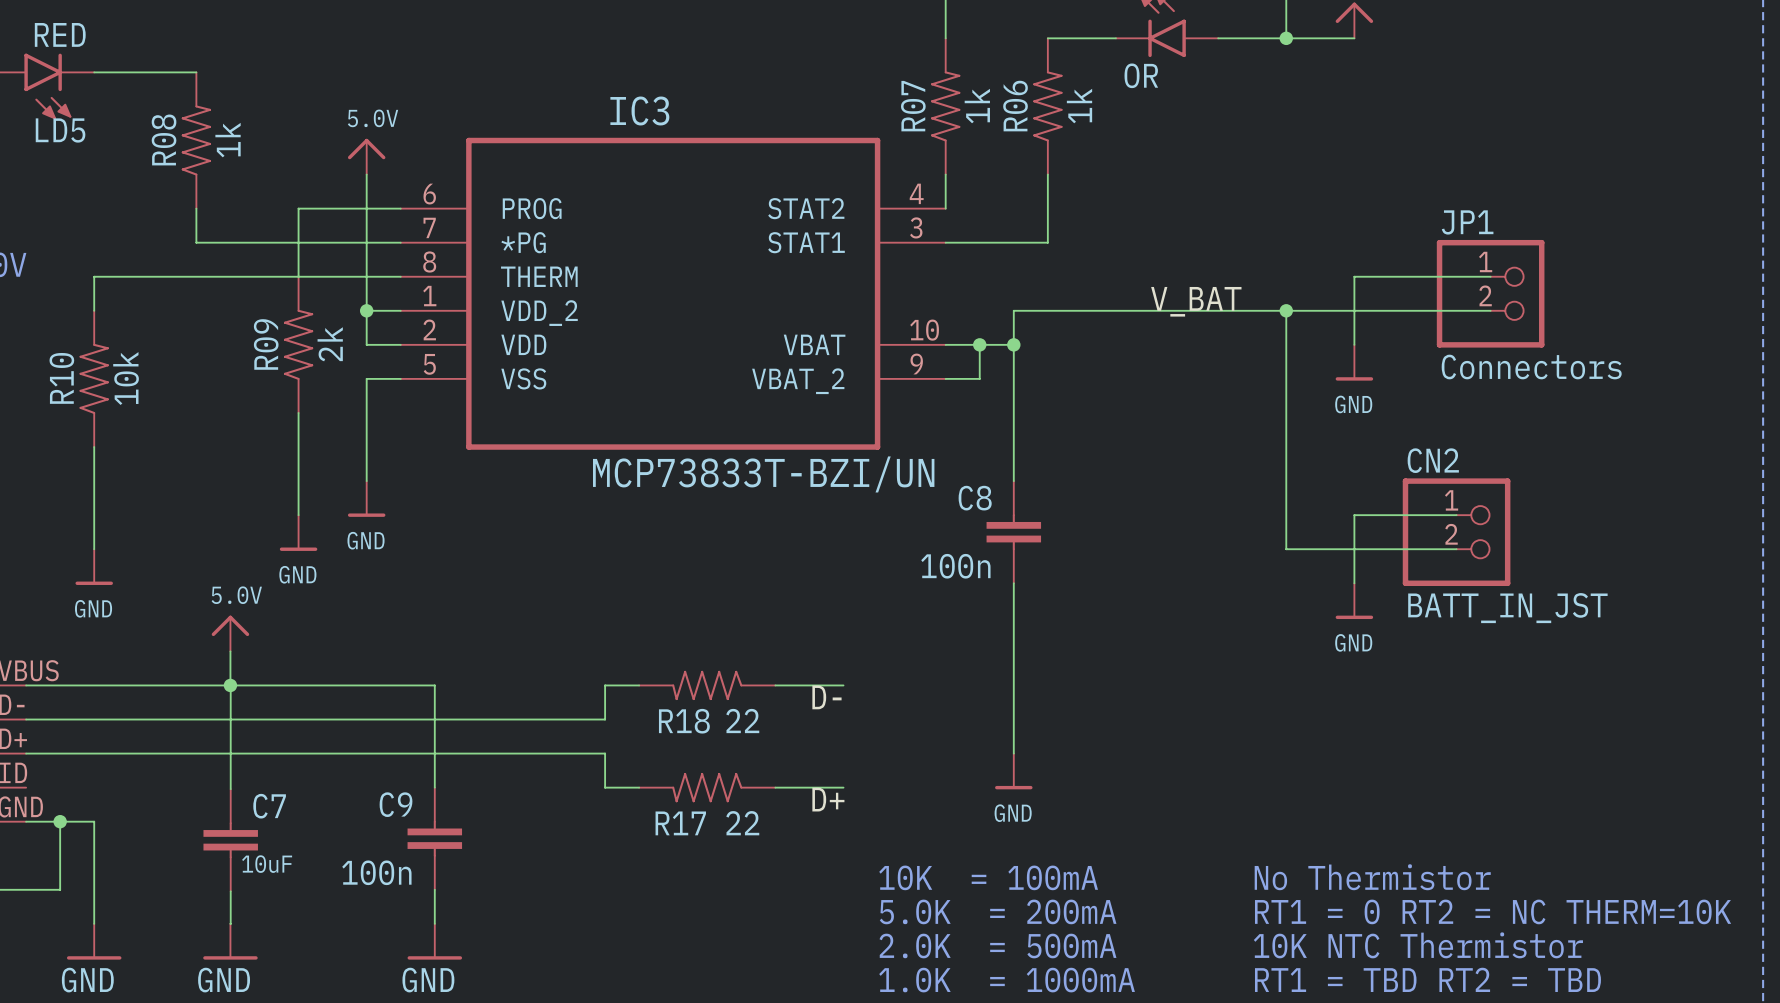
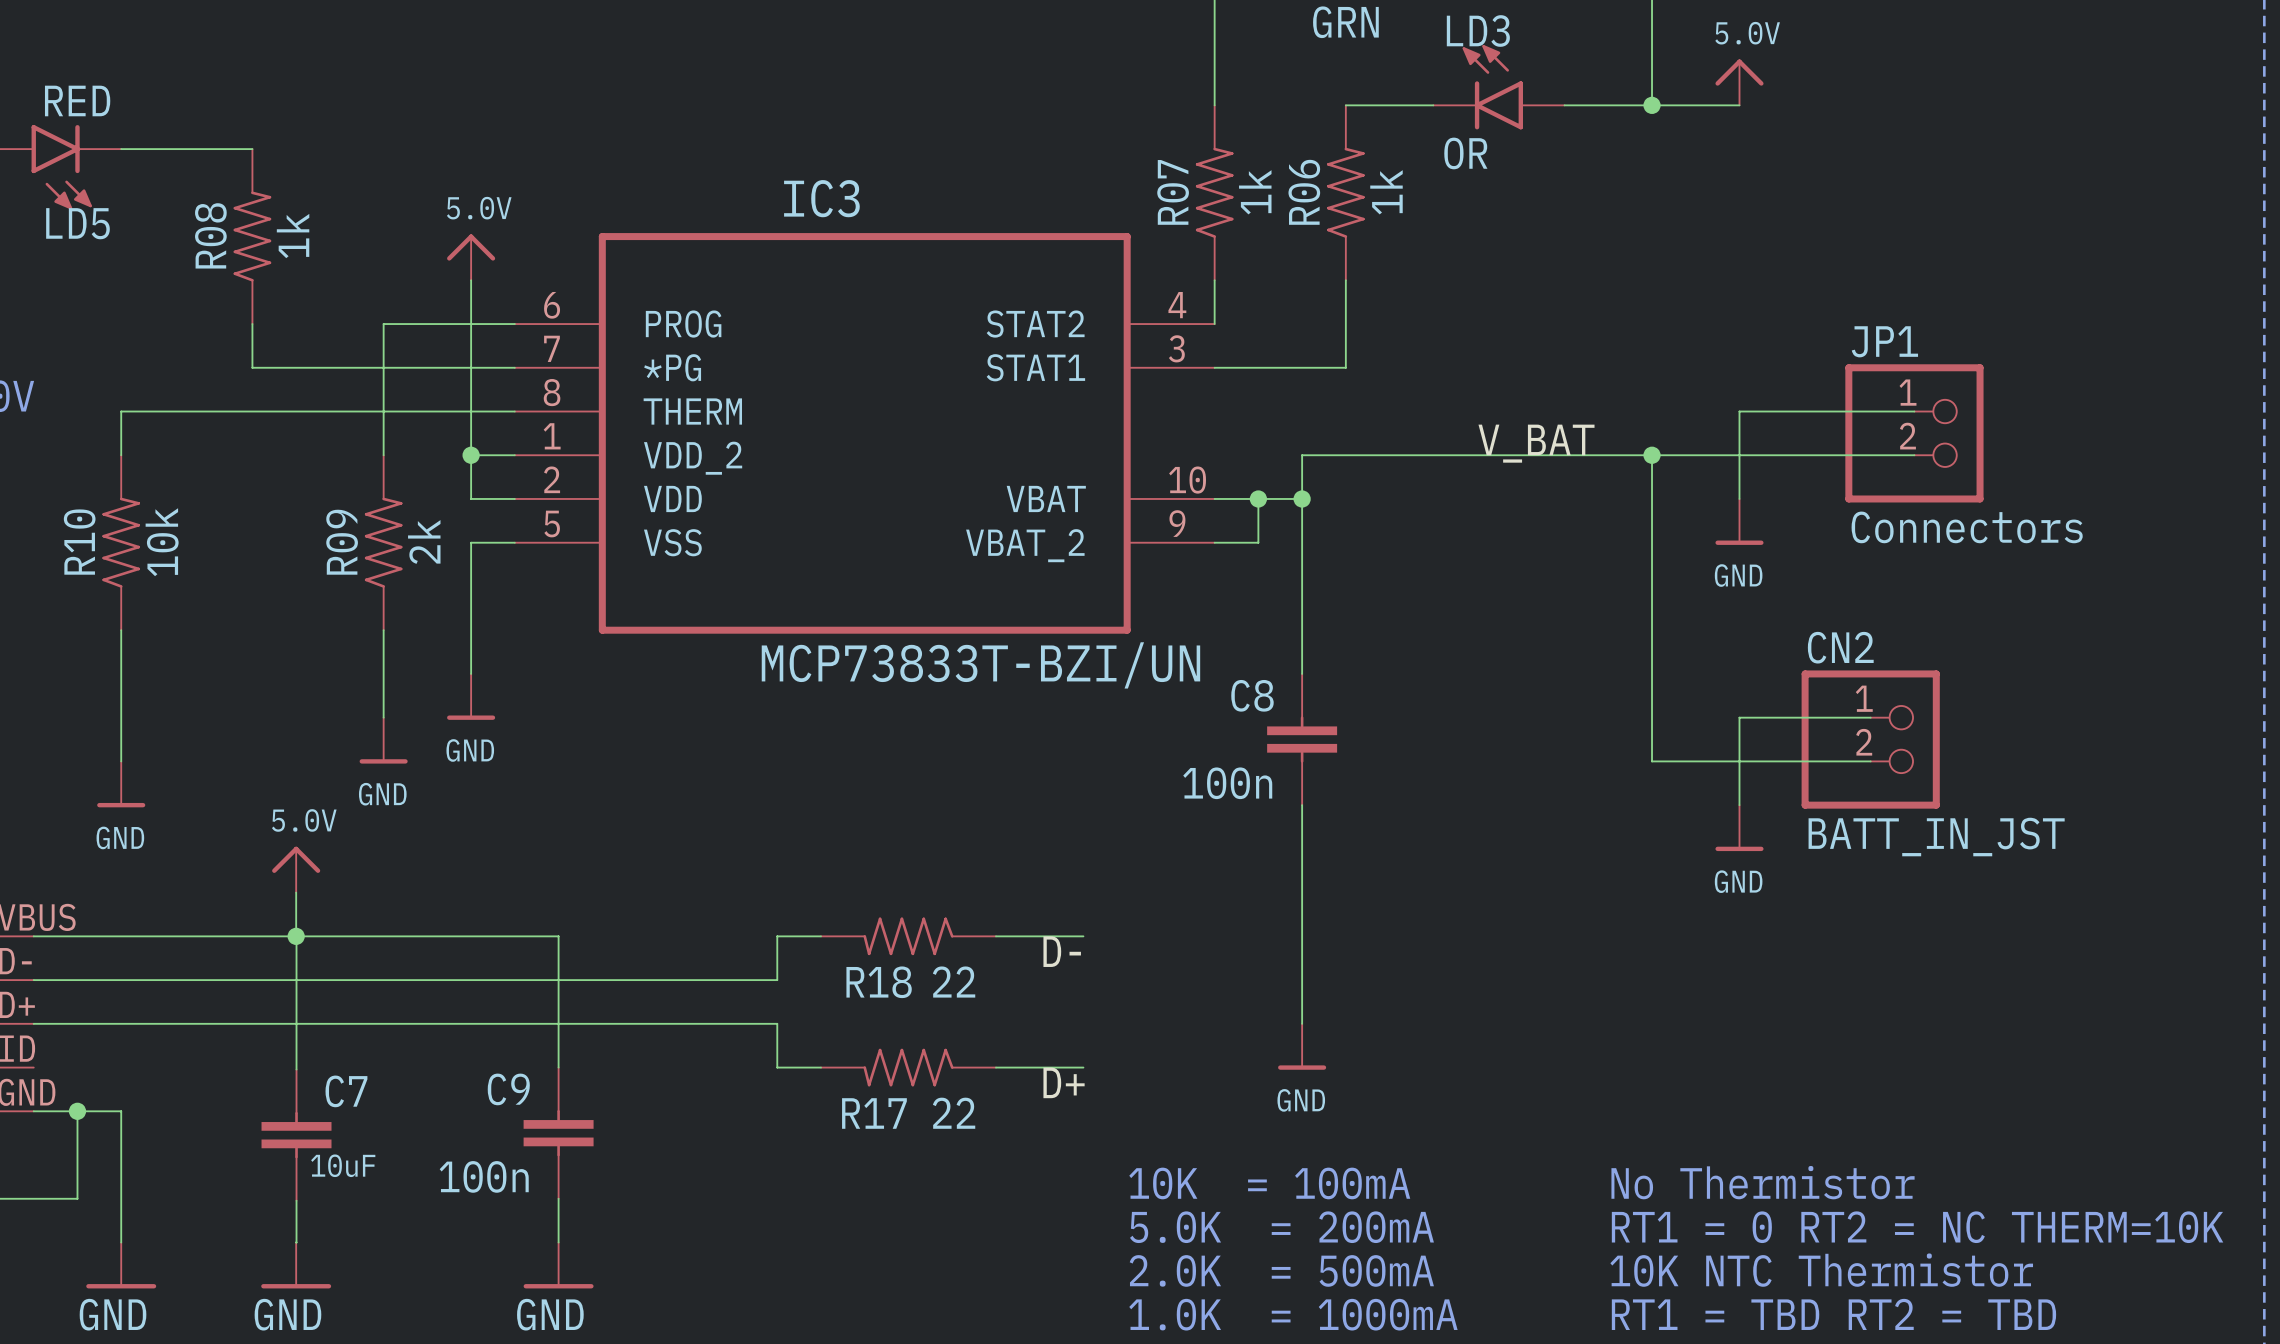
R09 position: (298, 344) -> (383, 542)

